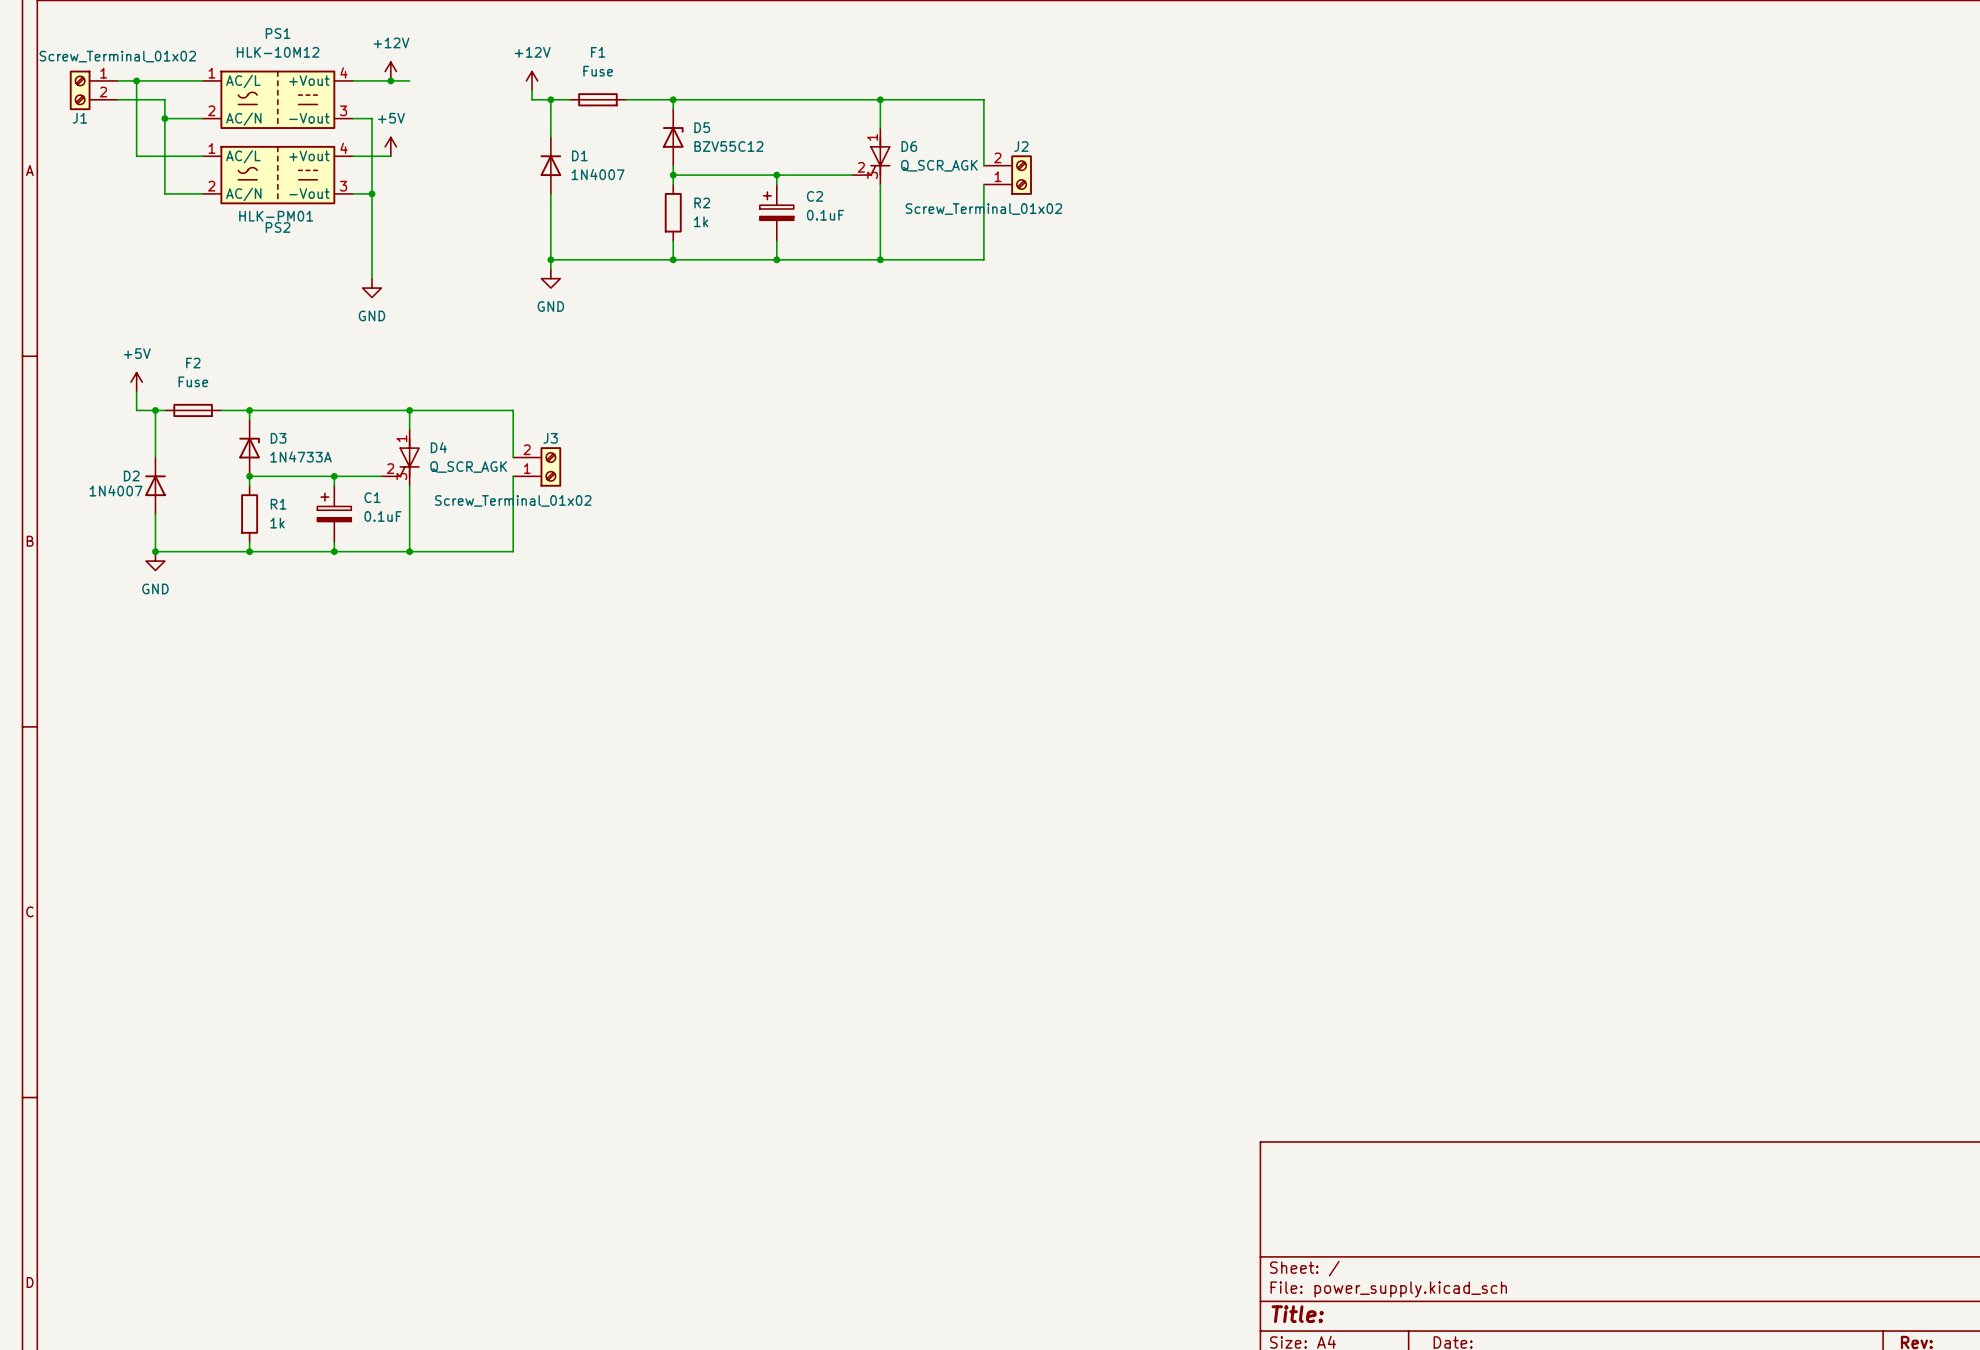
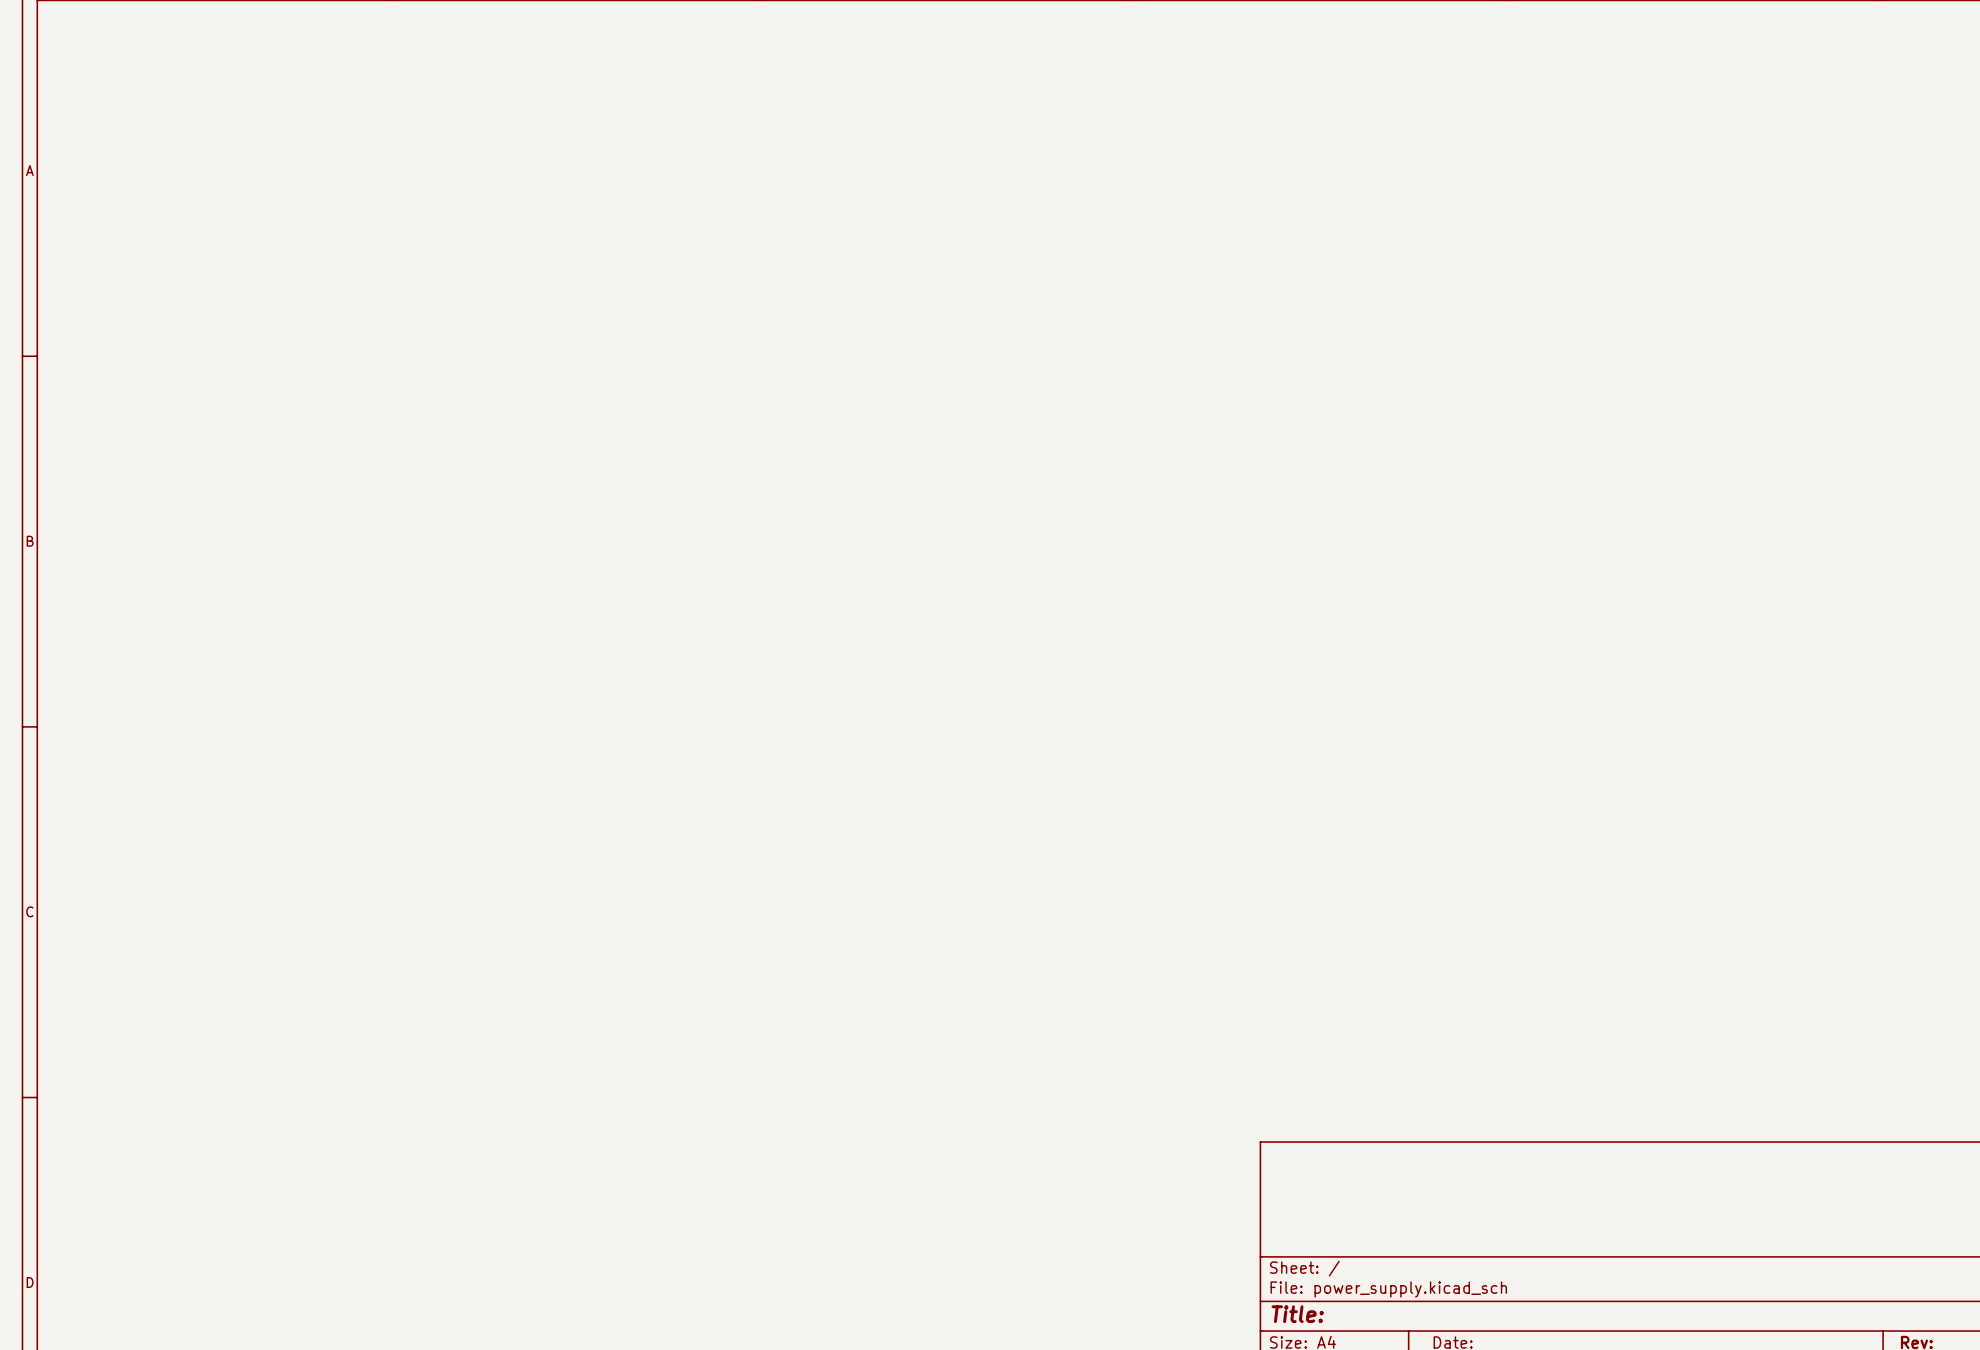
power symbol: +12V (390, 71) -> none
wire: (117, 80) (202, 80) -> none
wire: (136, 80) (136, 156) (202, 156) -> none
junction: (136, 80) -> none
wire: (353, 80) (409, 80) -> none
junction: (390, 80) -> none
power symbol: +12V (532, 80) -> none
J1: Screw_Terminal_01x02 (93, 90) -> none
wire: (532, 90) (532, 99) (569, 99) -> none
wire: (117, 99) (164, 99) (164, 193) (202, 193) -> none
PS1: HLK-10M12 (277, 99) -> none
wire: (550, 99) (550, 137) -> none
junction: (550, 99) -> none
F1: Fuse (597, 99) -> none
wire: (626, 99) (983, 99) (983, 165) -> none
wire: (673, 99) (673, 109) -> none
junction: (673, 99) -> none
wire: (880, 99) (880, 128) -> none
junction: (880, 99) -> none
wire: (164, 118) (202, 118) -> none
junction: (164, 118) -> none
wire: (353, 118) (371, 118) (371, 278) -> none
D5: BZV55C12 (673, 137) -> none
power symbol: +5V (390, 146) -> none
wire: (353, 156) (390, 156) -> none
D6: Q_SCR_AGK (871, 156) -> none
D1: 1N4007 (550, 165) -> none
wire: (673, 165) (673, 184) -> none
PS2: HLK-PM01 (277, 175) -> none
wire: (673, 175) (852, 175) -> none
junction: (673, 175) -> none
wire: (776, 175) (776, 184) -> none
junction: (776, 175) -> none
J2: Screw_Terminal_01x02 (1007, 175) -> none
wire: (880, 184) (880, 259) -> none
wire: (983, 184) (983, 259) (550, 259) -> none
wire: (353, 193) (371, 193) -> none
junction: (371, 193) -> none
wire: (550, 193) (550, 269) -> none
R2: 1k (673, 212) -> none
C2: 0.1uF (776, 212) -> none
wire: (673, 240) (673, 259) -> none
wire: (776, 240) (776, 259) -> none
junction: (550, 259) -> none
junction: (673, 259) -> none
junction: (776, 259) -> none
junction: (880, 259) -> none
power symbol: GND (550, 278) -> none
power symbol: GND (371, 288) -> none
power symbol: +5V (136, 382) -> none
wire: (136, 391) (136, 410) (164, 410) -> none
wire: (155, 410) (155, 457) -> none
junction: (155, 410) -> none
F2: Fuse (193, 410) -> none
wire: (221, 410) (513, 410) (513, 457) -> none
wire: (249, 410) (249, 419) -> none
junction: (249, 410) -> none
wire: (409, 410) (409, 429) -> none
junction: (409, 410) -> none
D3: 1N4733A (249, 448) -> none
D4: Q_SCR_AGK (400, 457) -> none
J3: Screw_Terminal_01x02 (537, 466) -> none
junction: (249, 476) -> none
wire: (334, 476) (334, 485) -> none
junction: (334, 476) -> none
wire: (381, 476) (249, 476) (249, 485) -> none
wire: (513, 476) (513, 551) (155, 551) (155, 514) -> none
D2: 1N4007 (155, 485) -> none
wire: (409, 485) (409, 551) -> none
R1: 1k (249, 514) -> none
C1: 0.1uF (334, 514) -> none
wire: (249, 542) (249, 551) -> none
wire: (334, 542) (334, 551) -> none
junction: (155, 551) -> none
junction: (249, 551) -> none
junction: (334, 551) -> none
junction: (409, 551) -> none
power symbol: GND (155, 561) -> none

